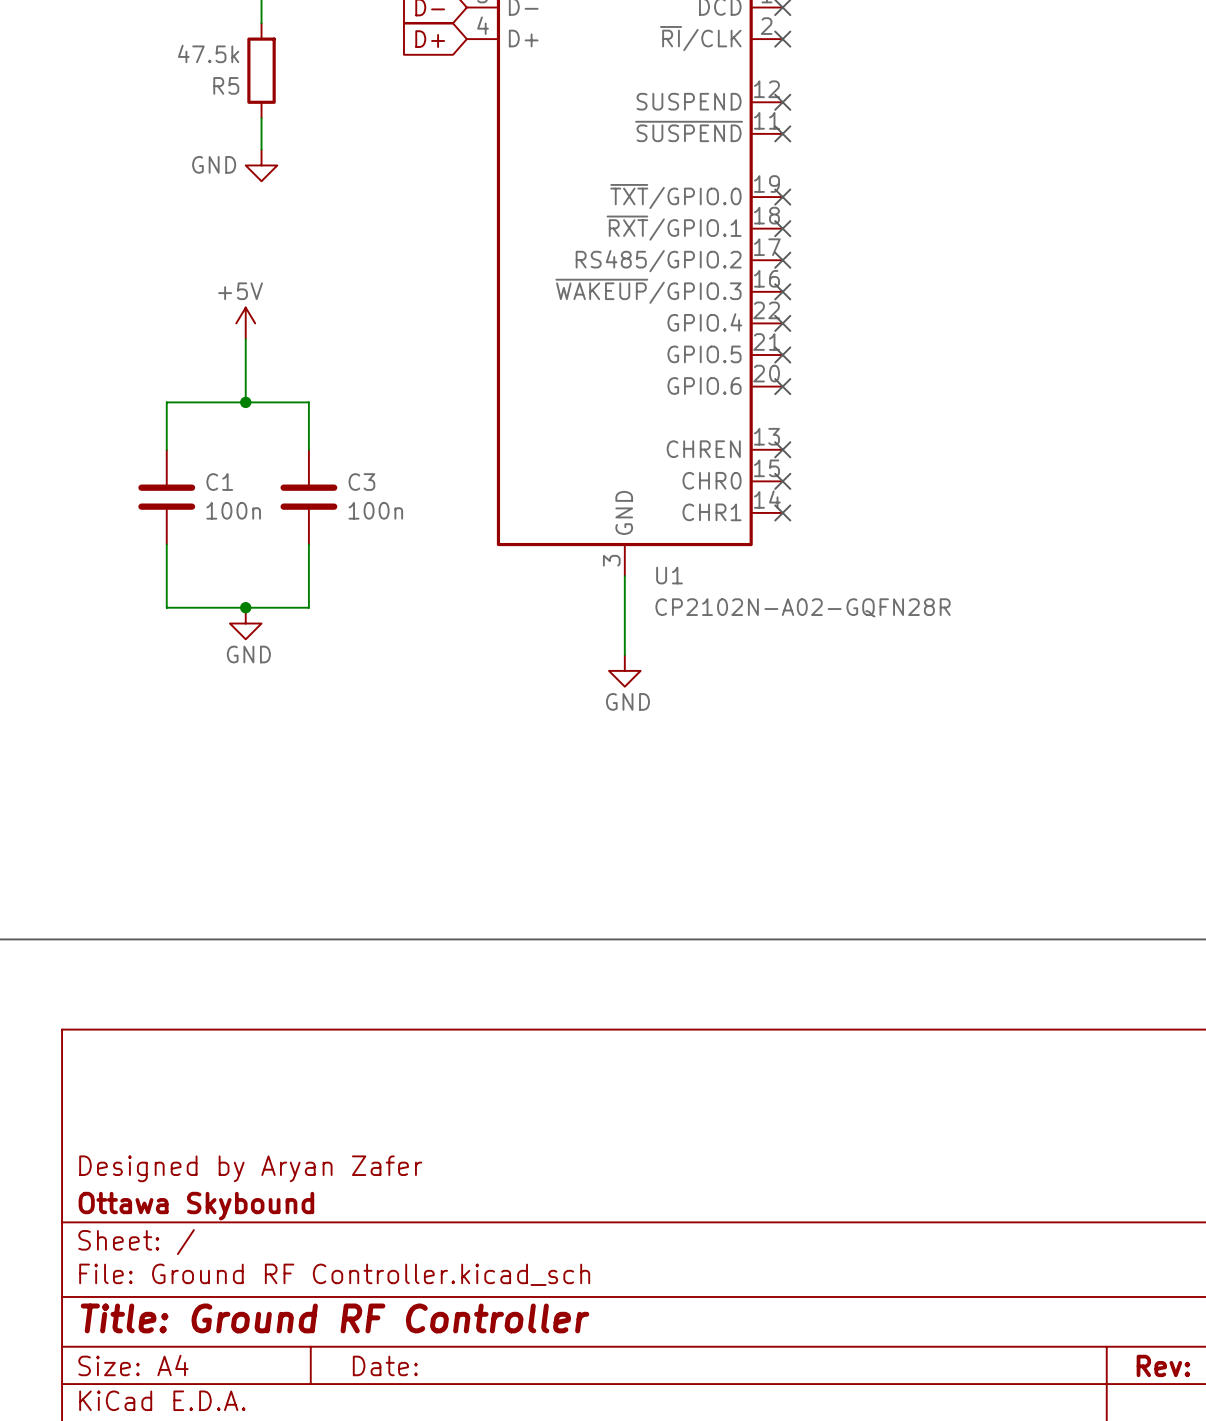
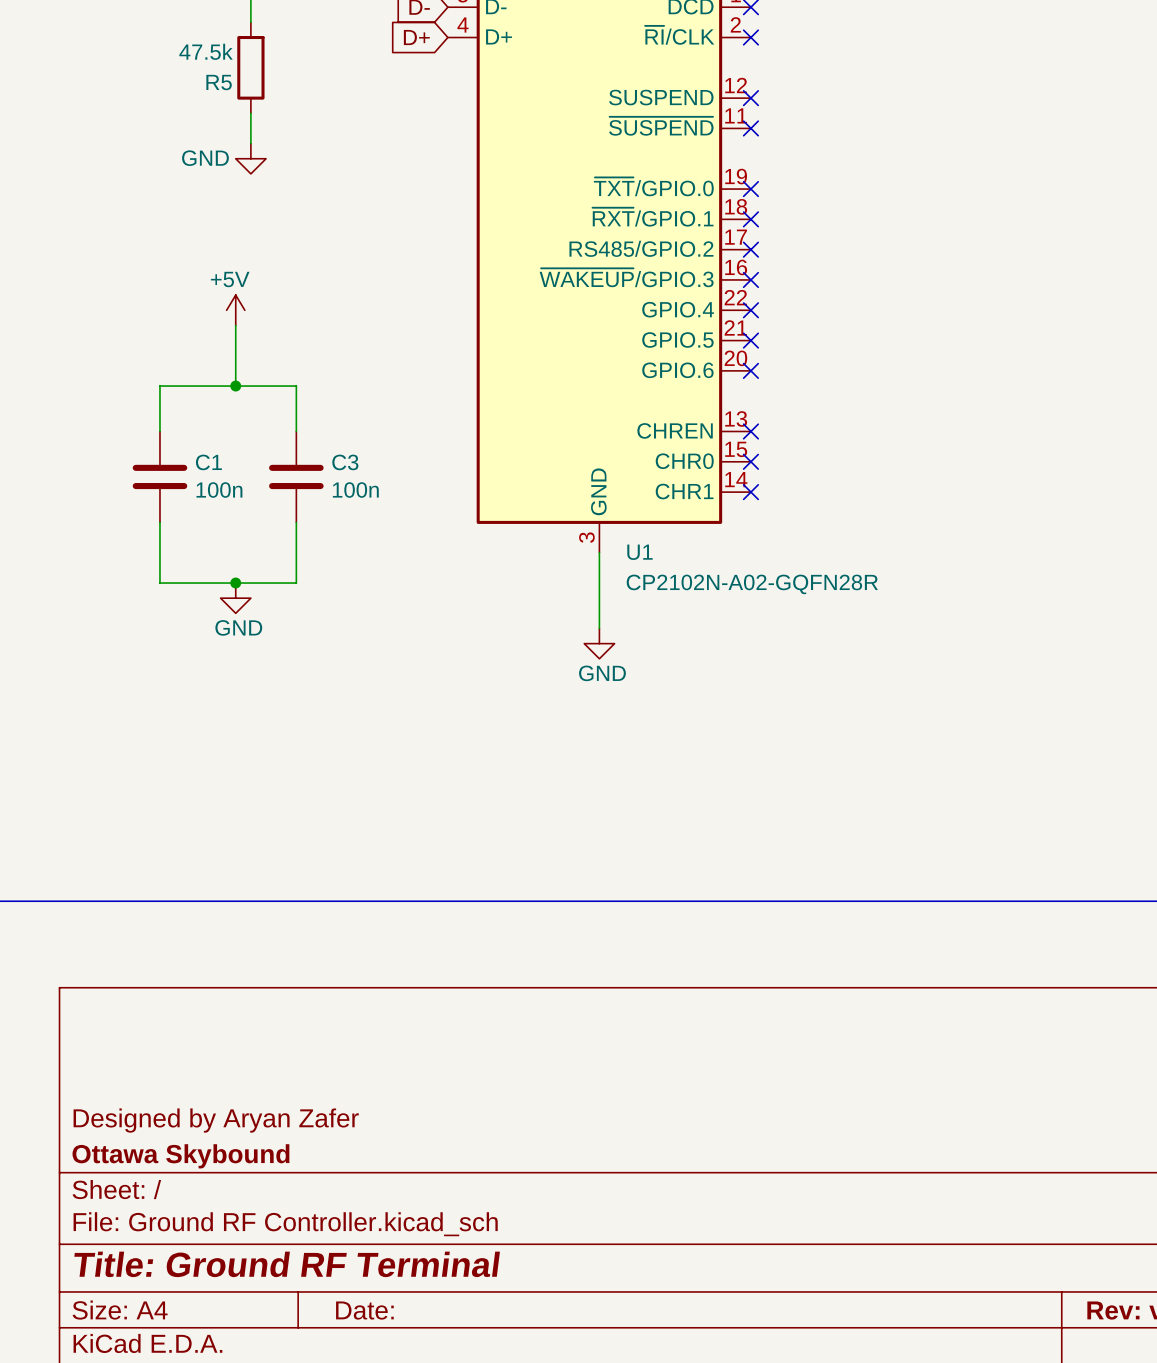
title block: Title: Ground RF Controller (335, 1318) -> Title: Ground RF Terminal (287, 1264)

